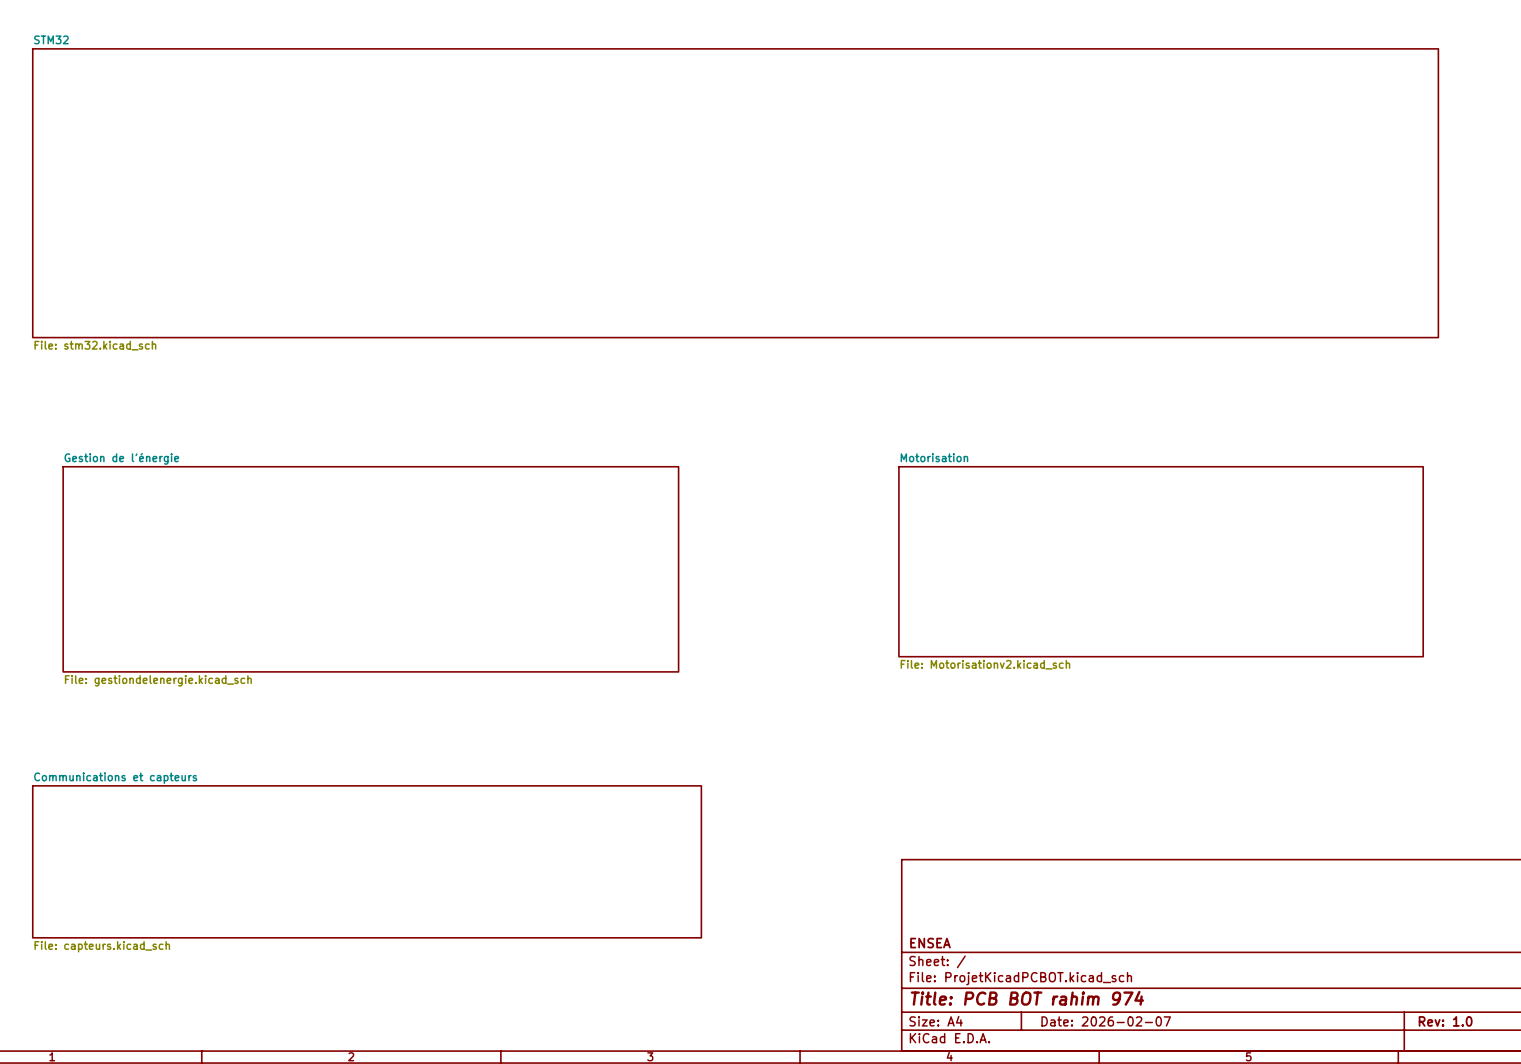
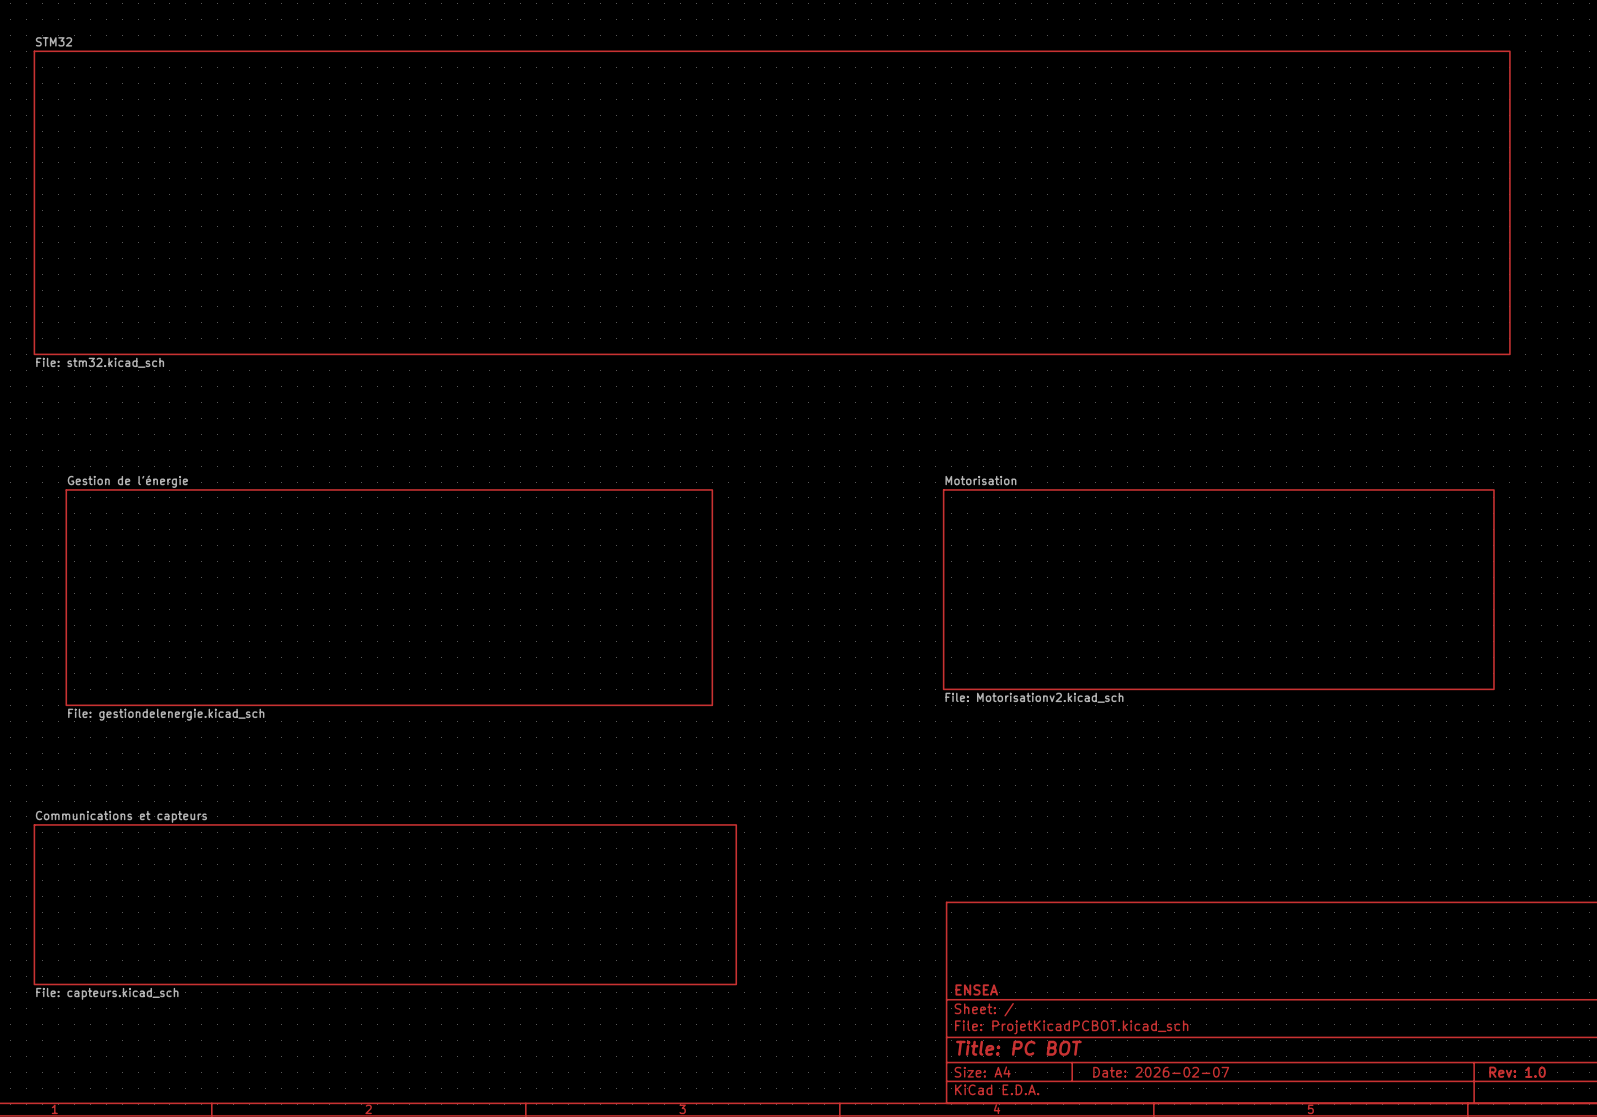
title block: Title: PCB BOT rahim 974 (1027, 998) -> Title: PC BOT (1018, 1048)

